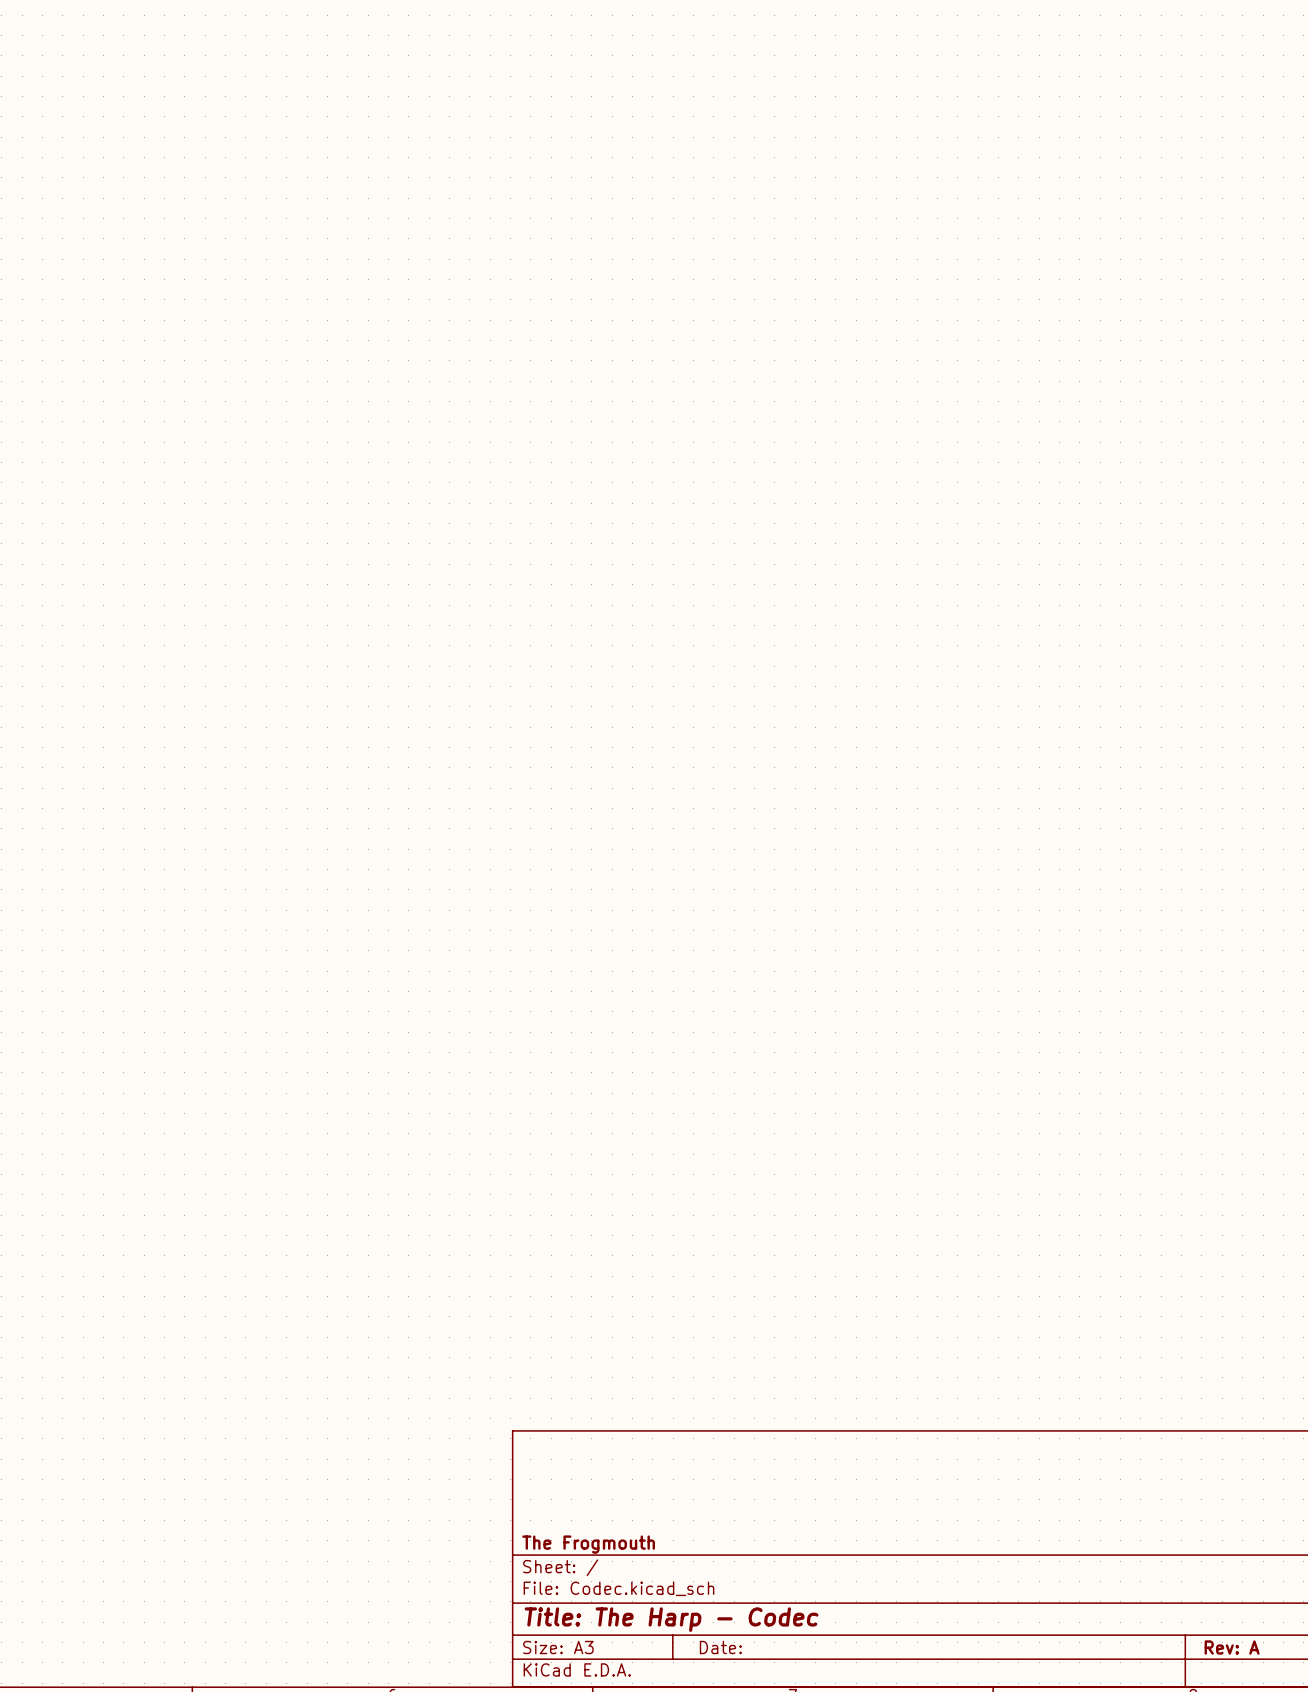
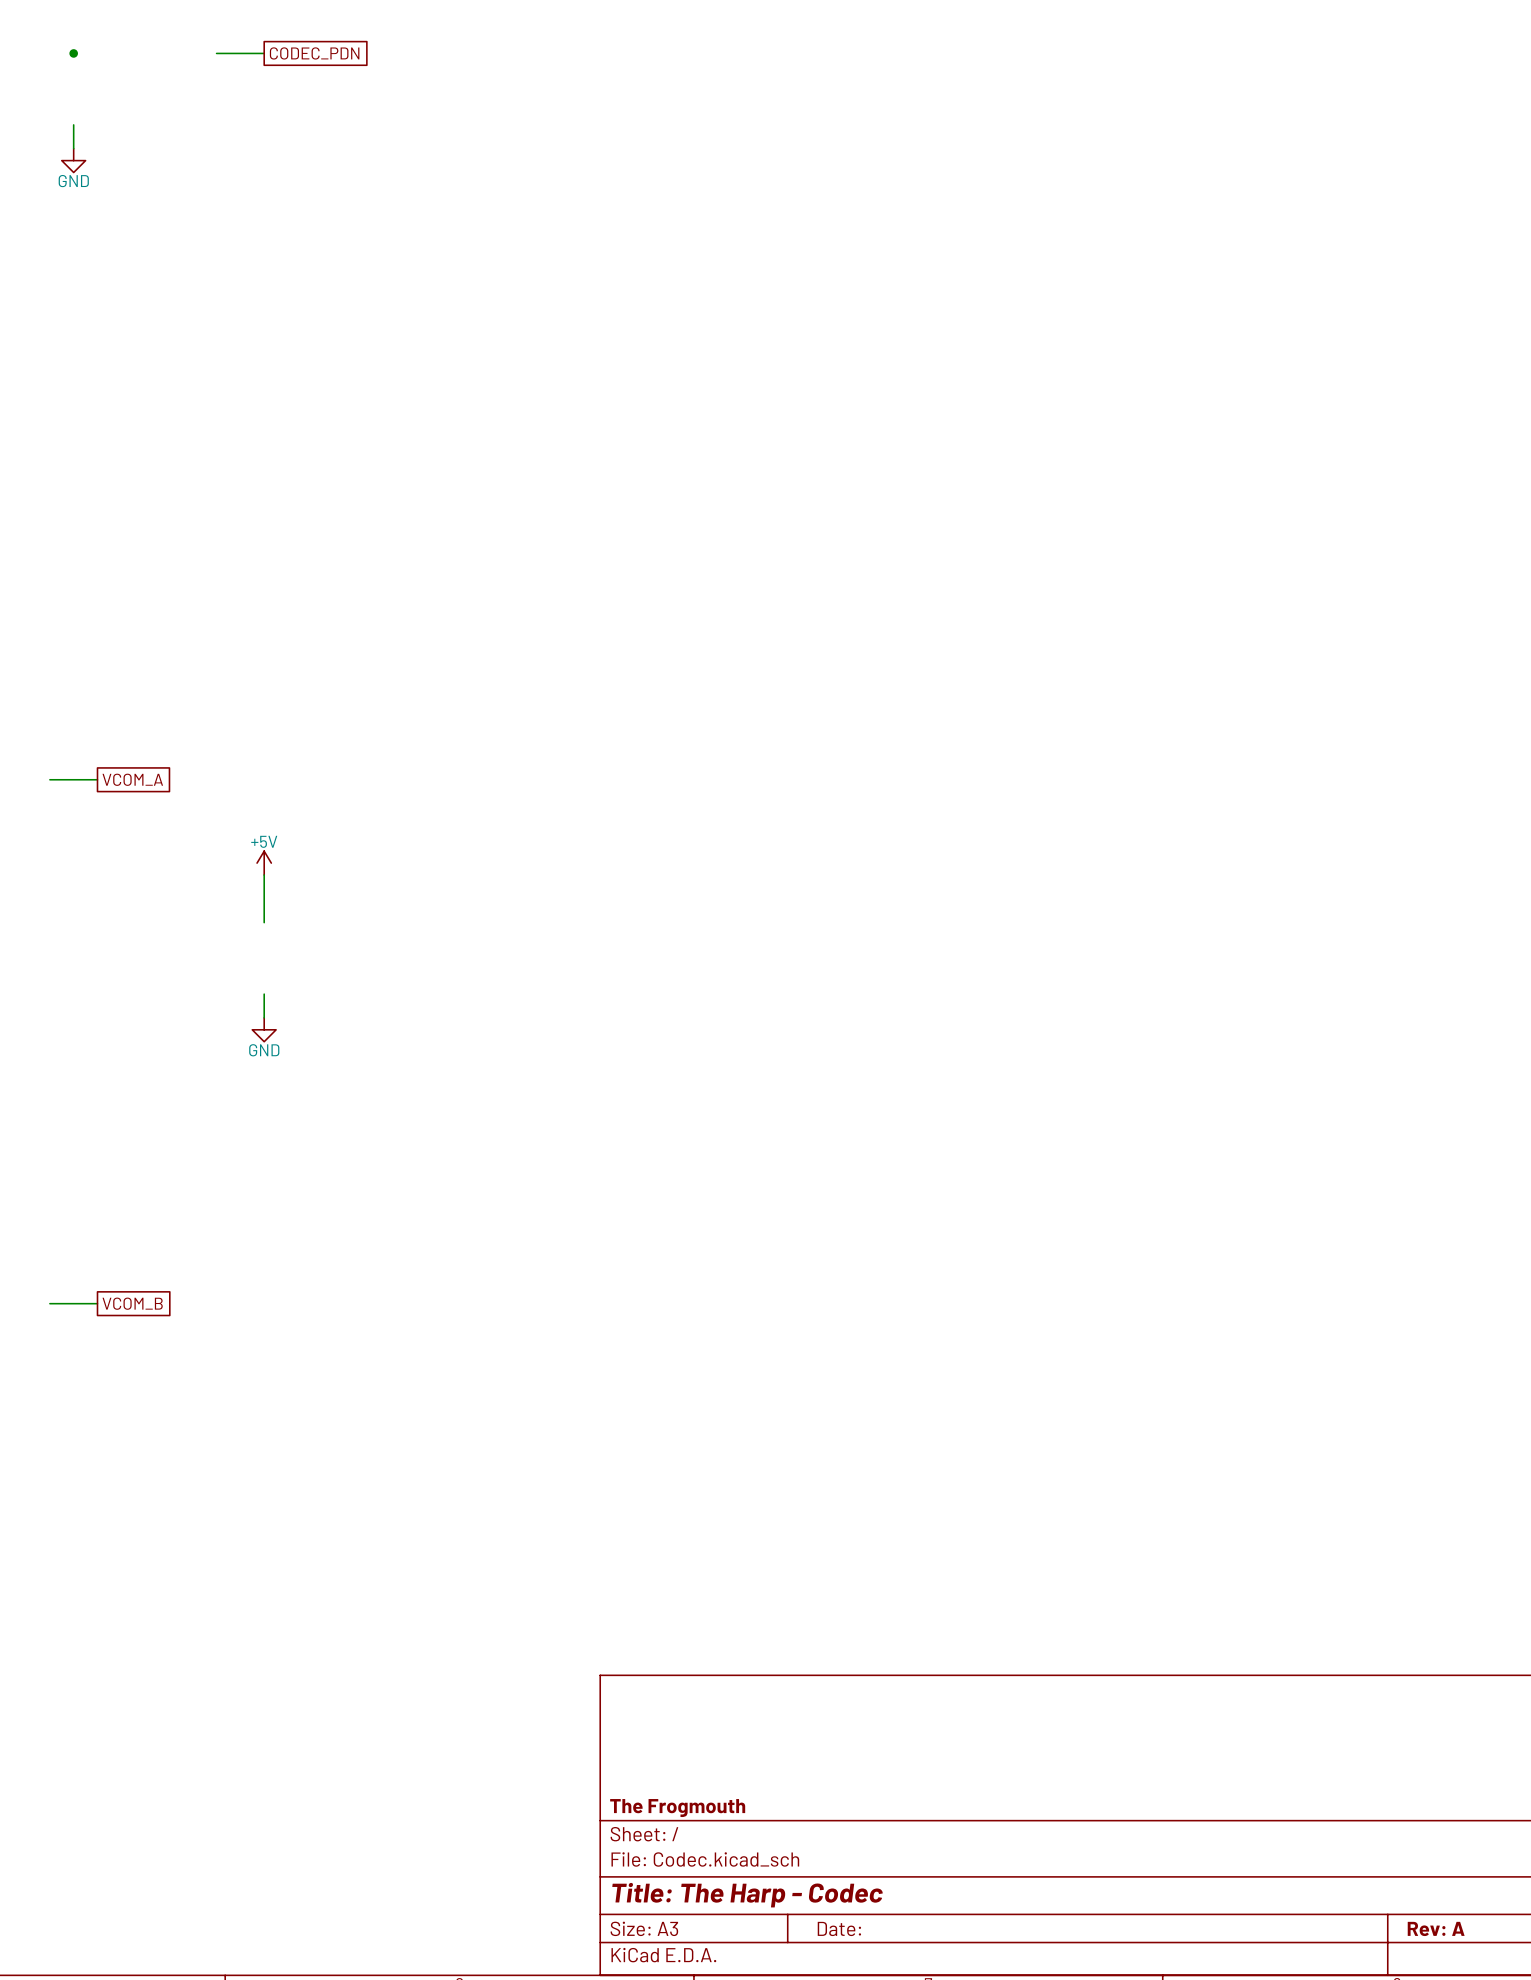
junction: none -> (73, 53)
wire: none -> (216, 53) (264, 53)
global label: none -> CODEC_PDN (314, 53)
wire: none -> (73, 124) (73, 148)
power symbol: none -> GND (73, 160)
wire: none -> (49, 779) (97, 779)
global label: none -> VCOM_A (132, 779)
power symbol: none -> +5V (264, 863)
wire: none -> (264, 875) (264, 922)
wire: none -> (264, 994) (264, 1017)
power symbol: none -> GND (264, 1029)
wire: none -> (49, 1303) (97, 1303)
global label: none -> VCOM_B (132, 1303)

